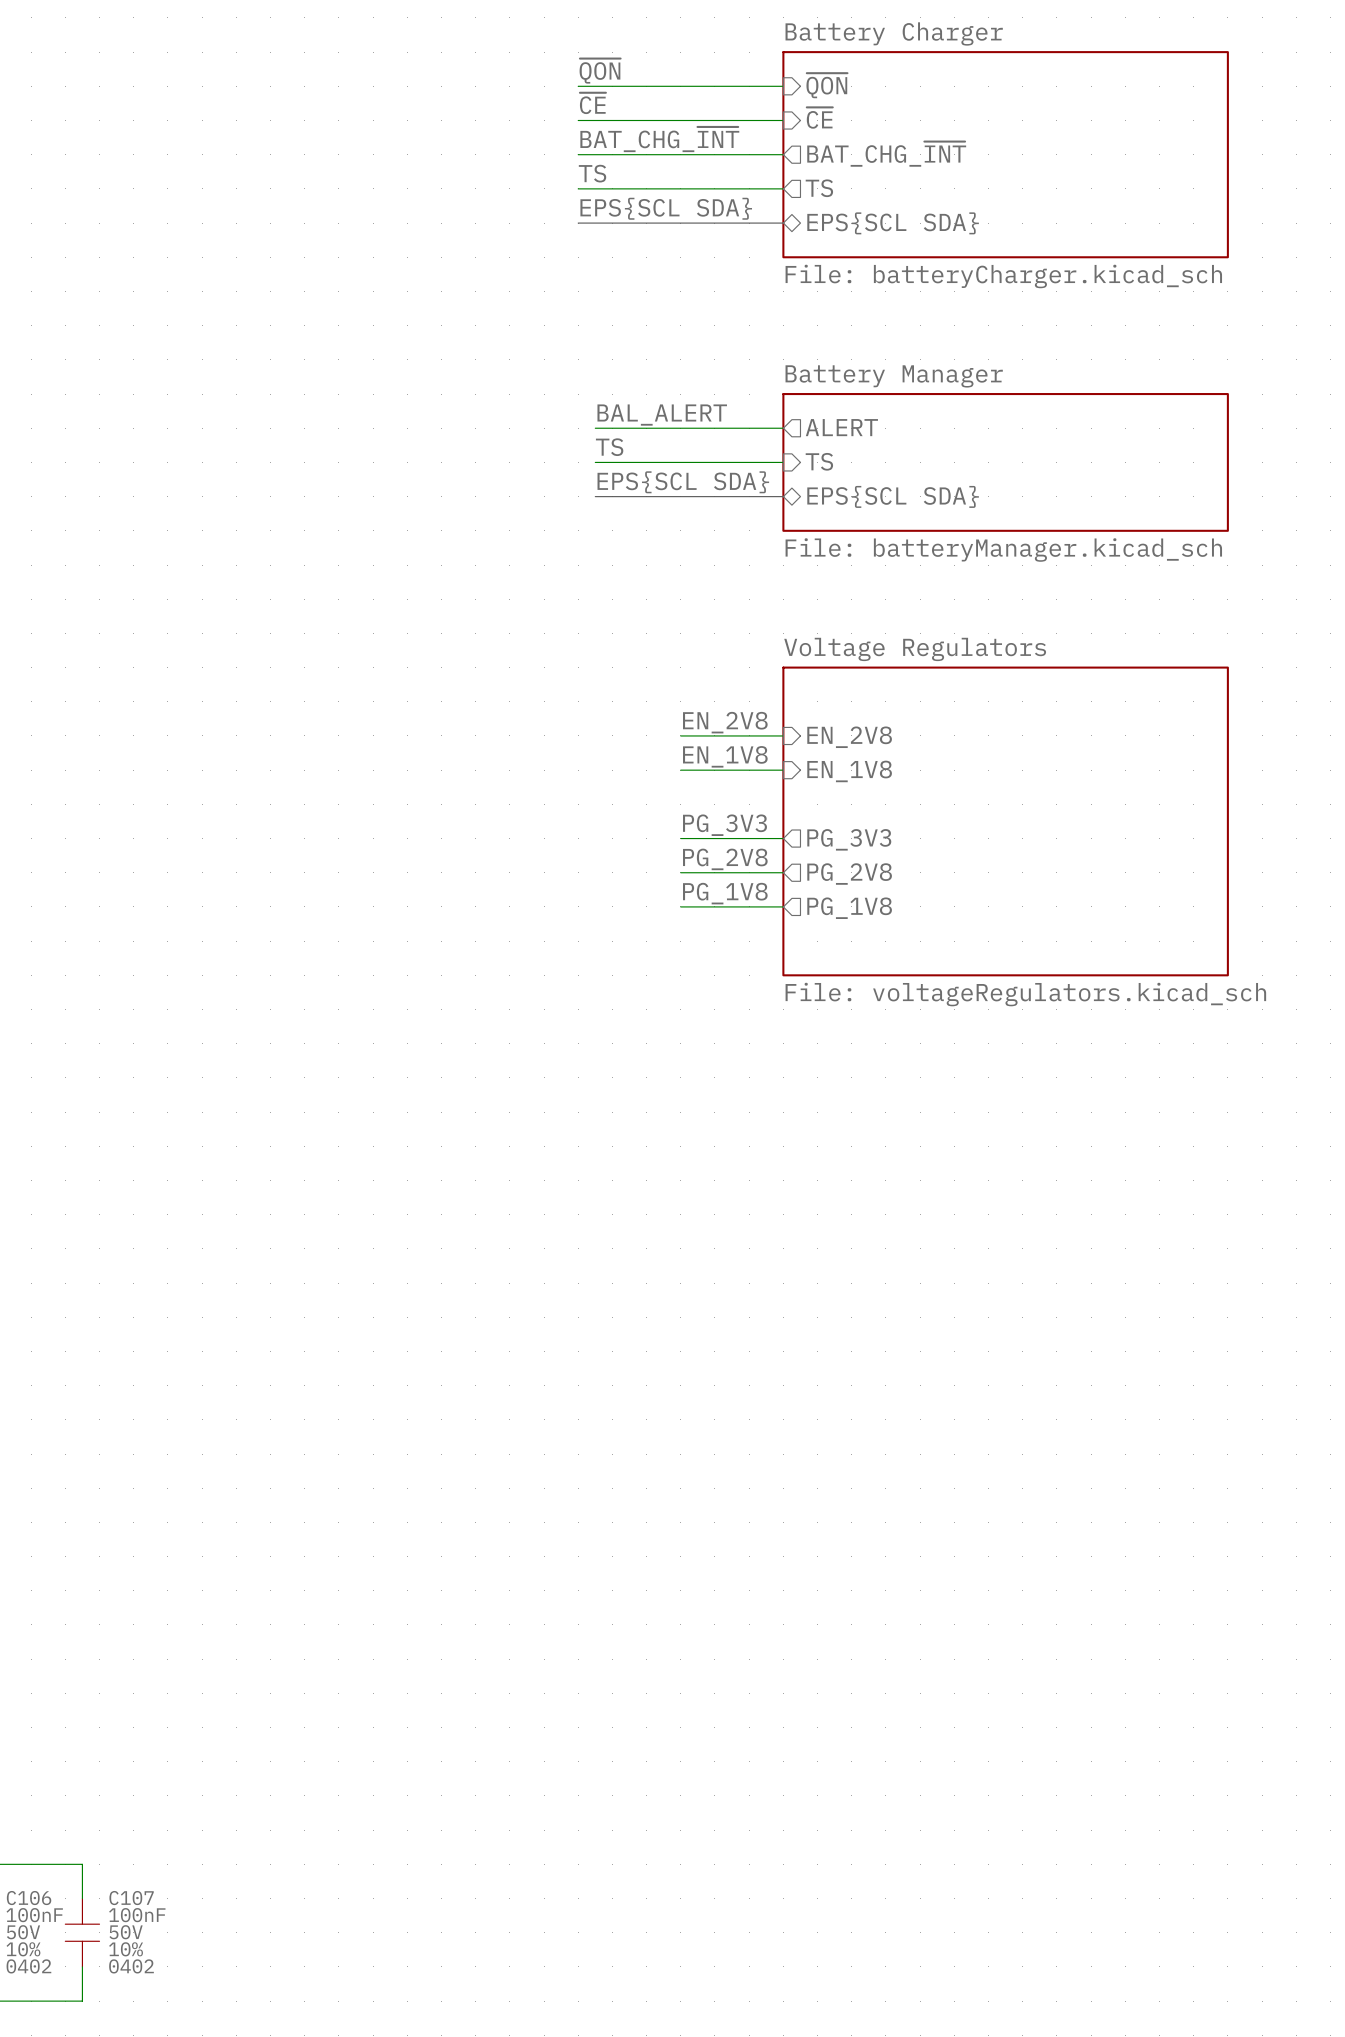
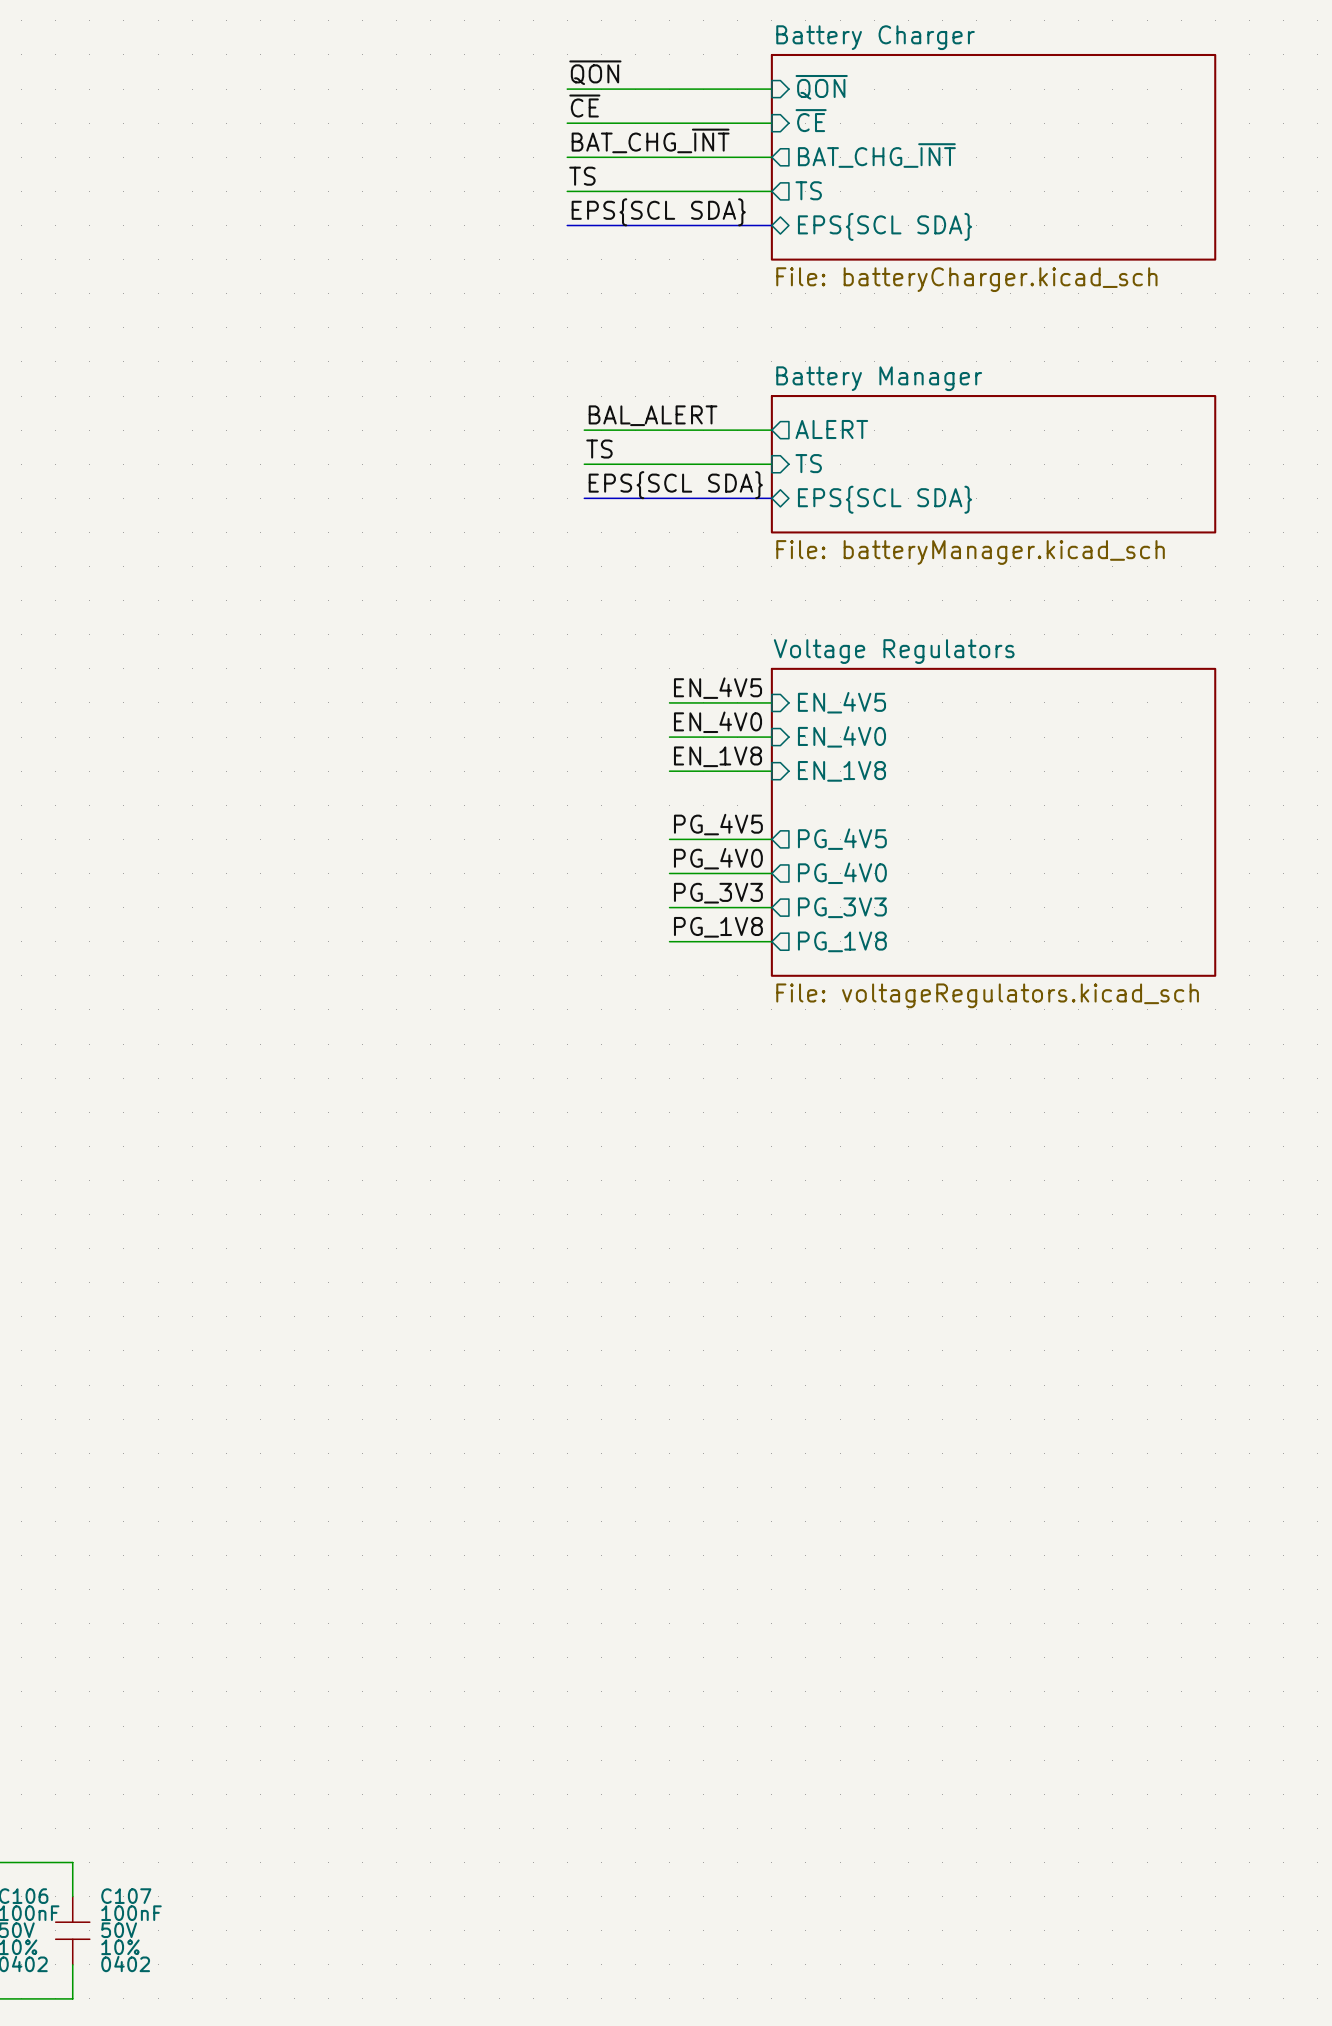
label: none -> EN_4V5 (718, 688)
wire: none -> (669, 702) (771, 702)
sheet pin: none -> EN_4V5 (841, 702)
label: EN_2V8 (725, 722) -> EN_4V0 (718, 722)
sheet pin: EN_2V8 (849, 737) -> EN_4V0 (841, 736)
label: PG_3V3 (724, 825) -> PG_4V5 (718, 824)
sheet pin: PG_3V3 (849, 839) -> PG_4V5 (842, 839)
label: PG_2V8 (725, 859) -> PG_4V0 (718, 858)
sheet pin: PG_2V8 (849, 874) -> PG_4V0 (842, 873)
label: PG_1V8 (725, 893) -> PG_3V3 (718, 893)
sheet pin: PG_1V8 (849, 908) -> PG_3V3 (842, 907)
label: none -> PG_1V8 (718, 927)
wire: none -> (669, 941) (771, 941)
sheet pin: none -> PG_1V8 (842, 941)

